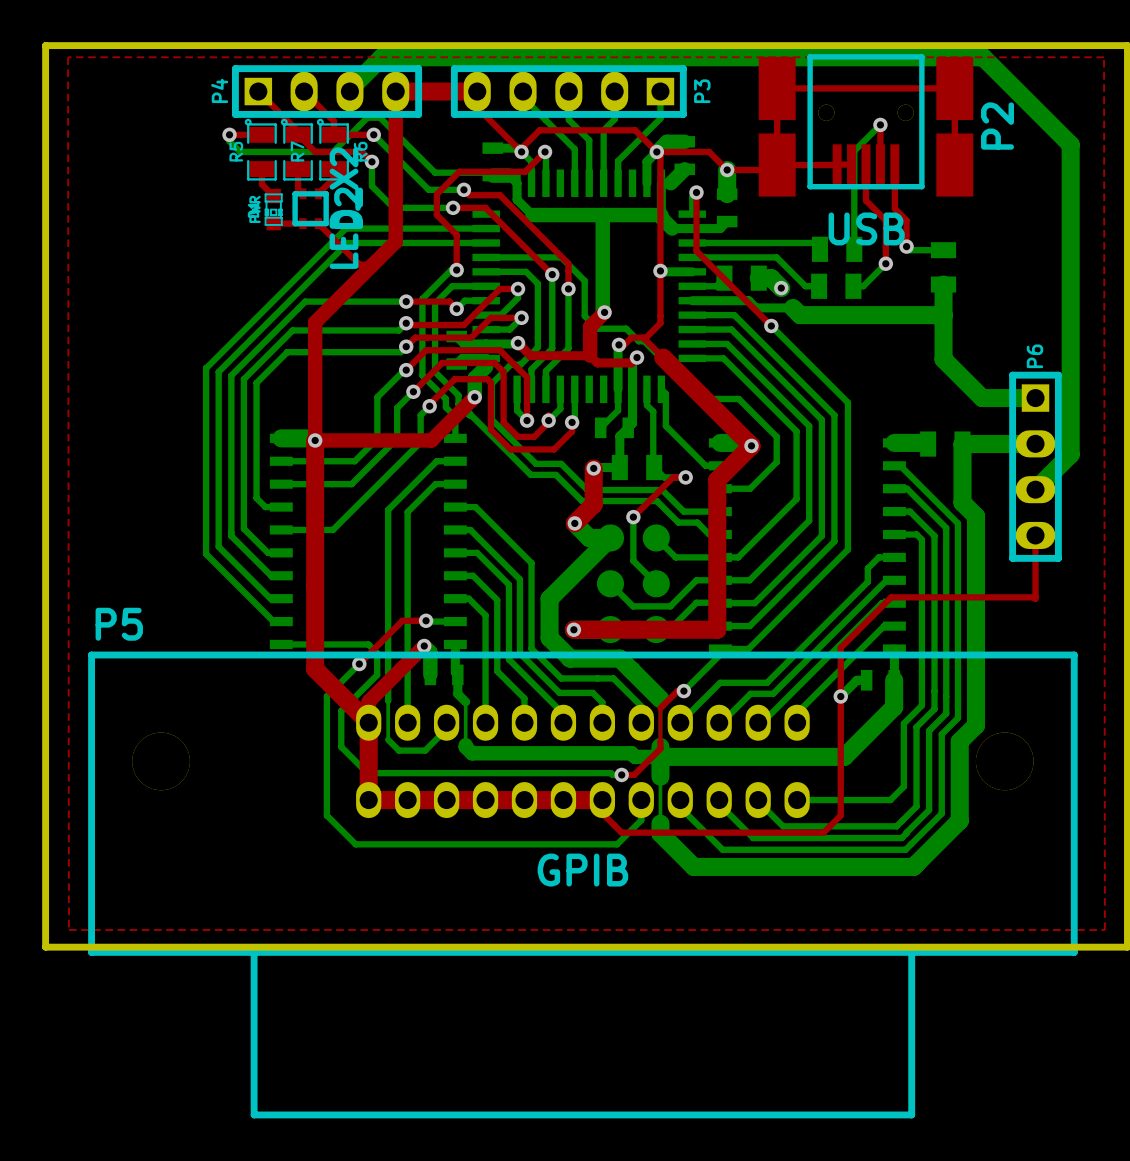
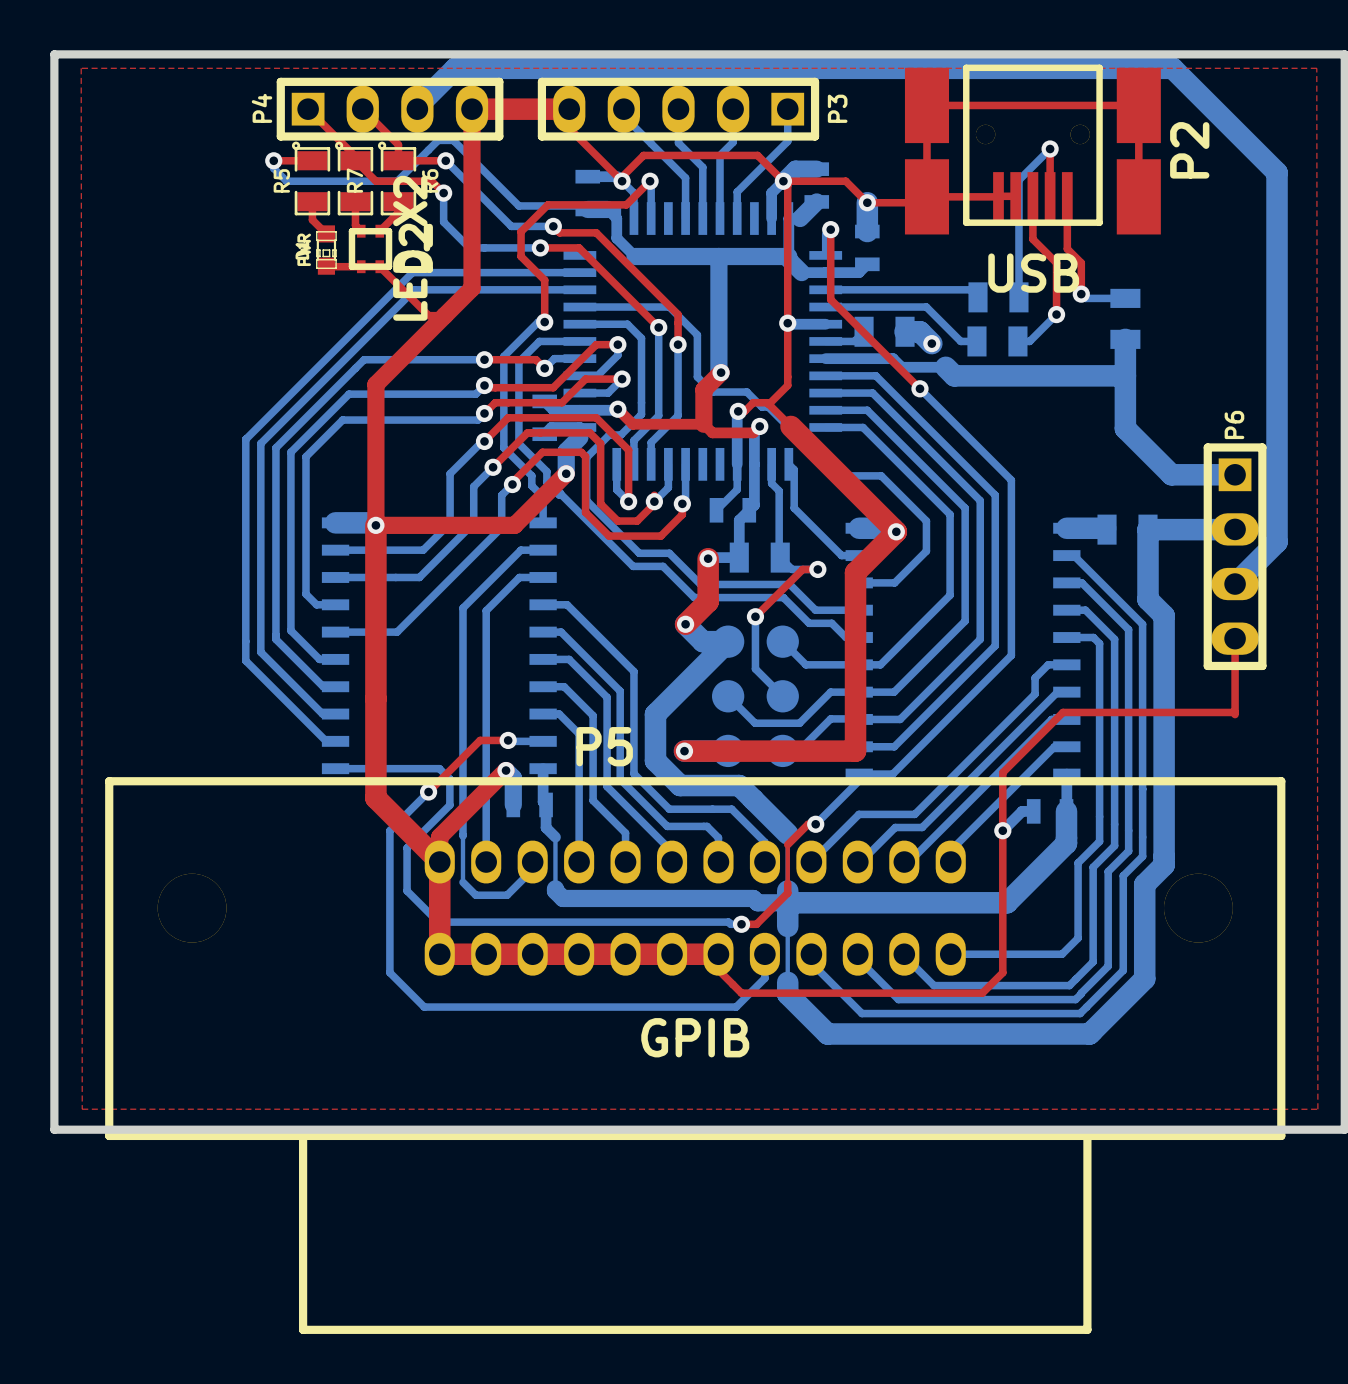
P5 name position: P5 (119, 624) -> P5 (604, 746)

